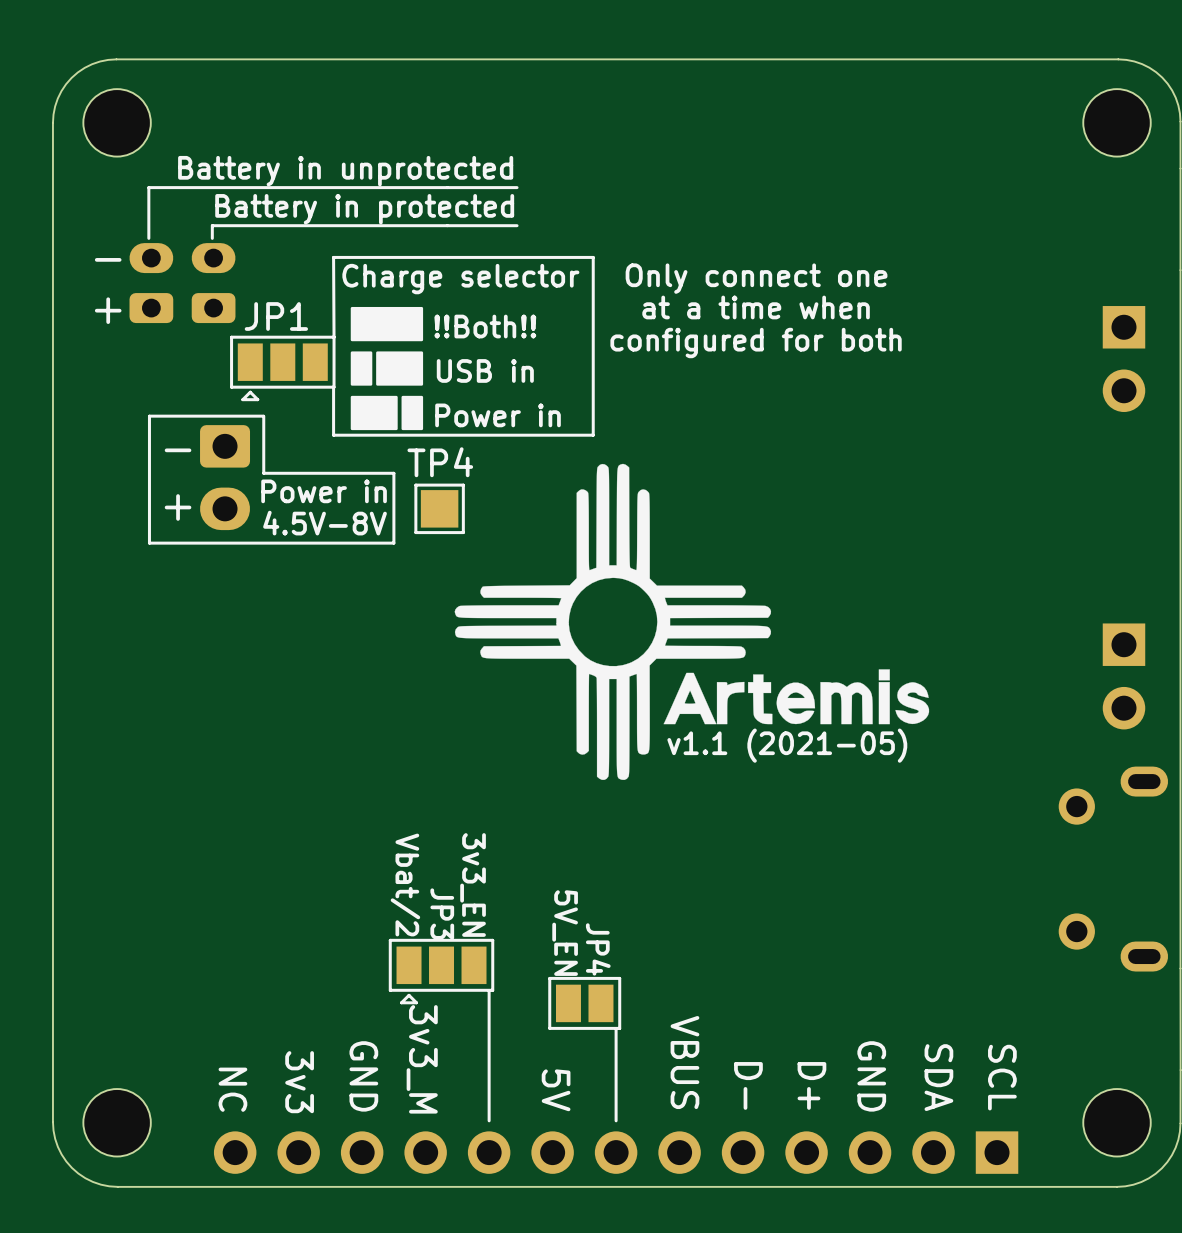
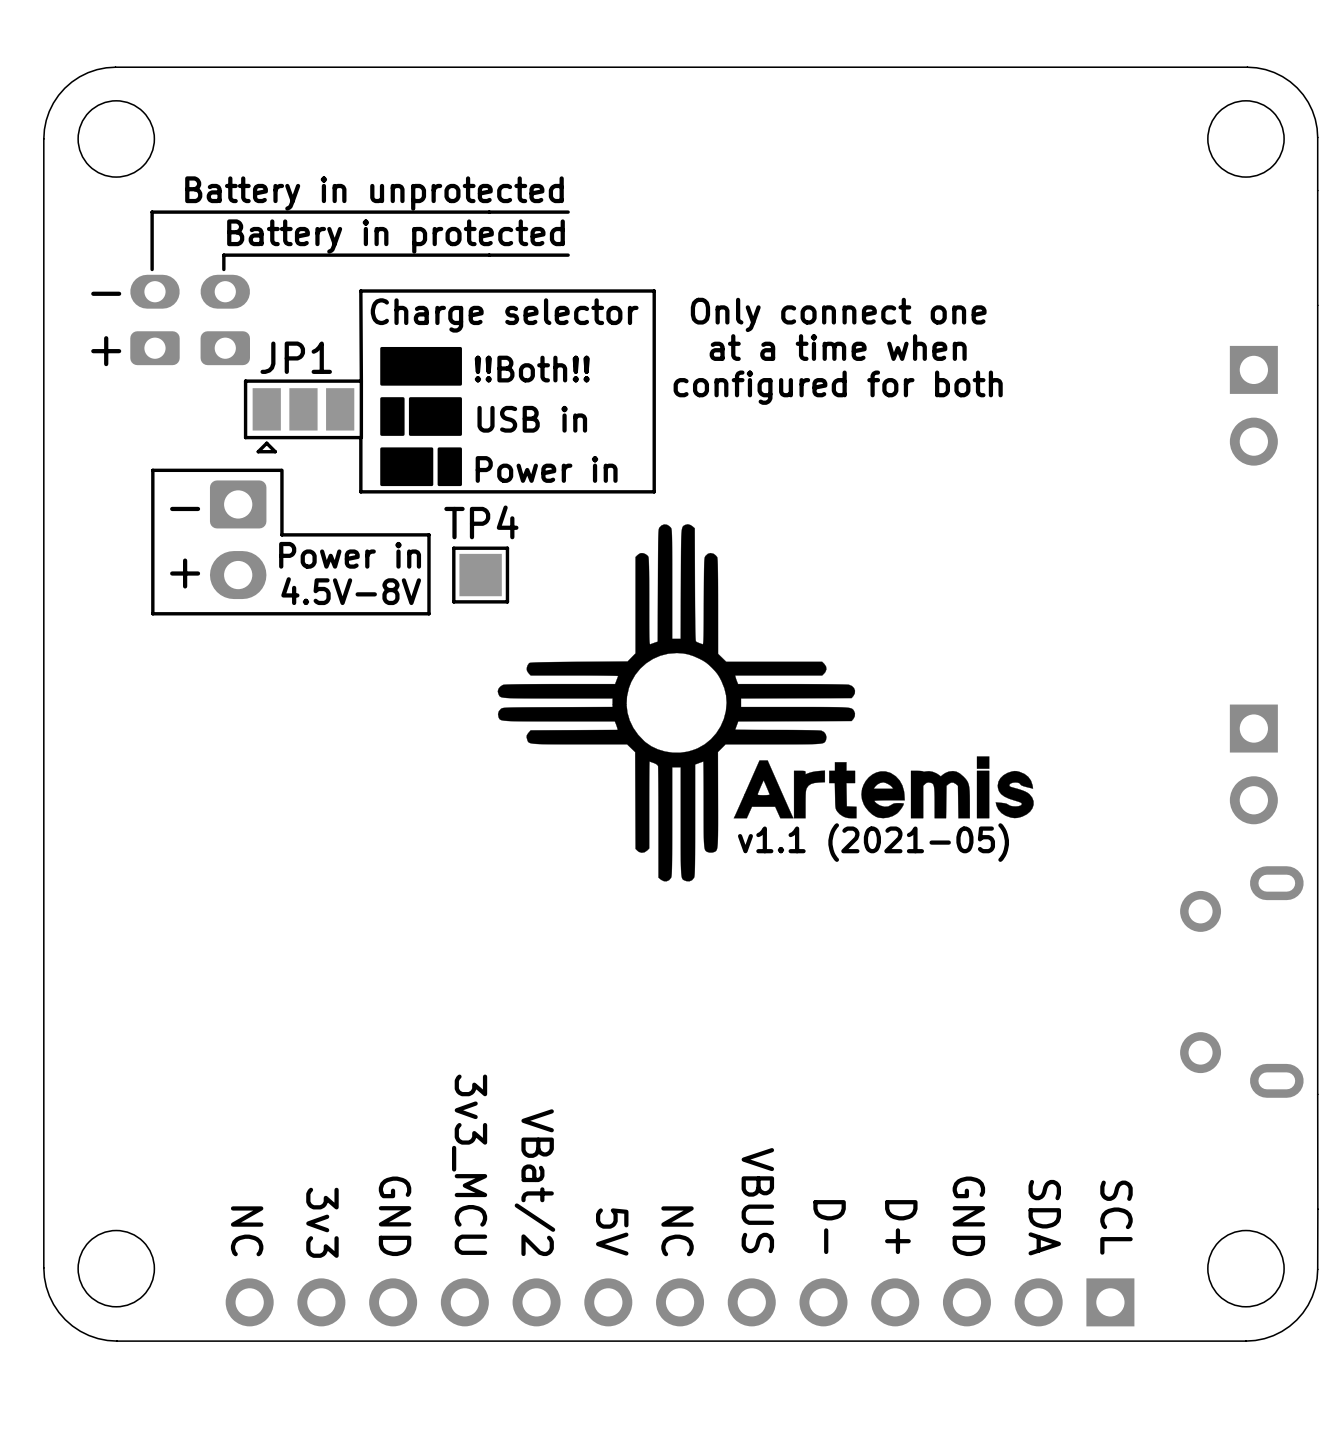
text: Vbat/2 (405, 885) -> none
text: 3v3_EN (473, 885) -> none
text: 5V_EN (565, 933) -> none
JP3: (441, 971) -> none
line: (489, 990) (489, 1120) -> none
JP4: (584, 1003) -> none
line: (616, 1028) (616, 1120) -> none
text: none -> VBat/2 (534, 1182)
text: 3v3_M (422, 1059) -> 3v3_MCU (469, 1164)
text: none -> NC (677, 1231)

